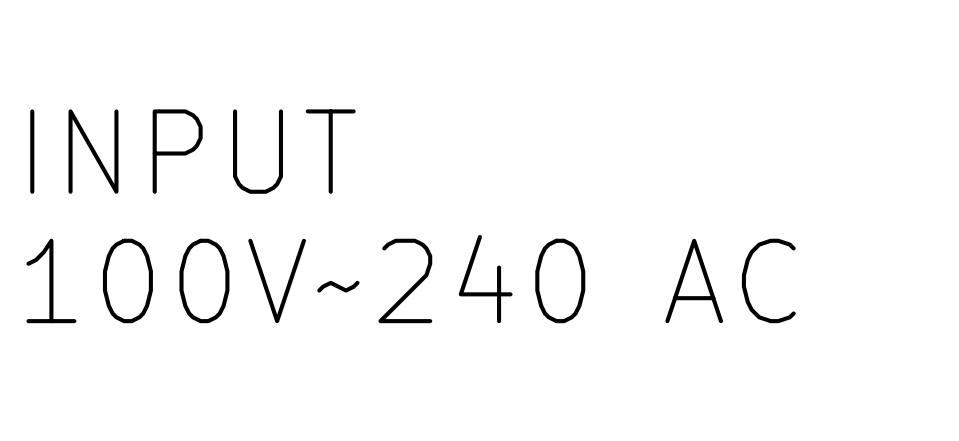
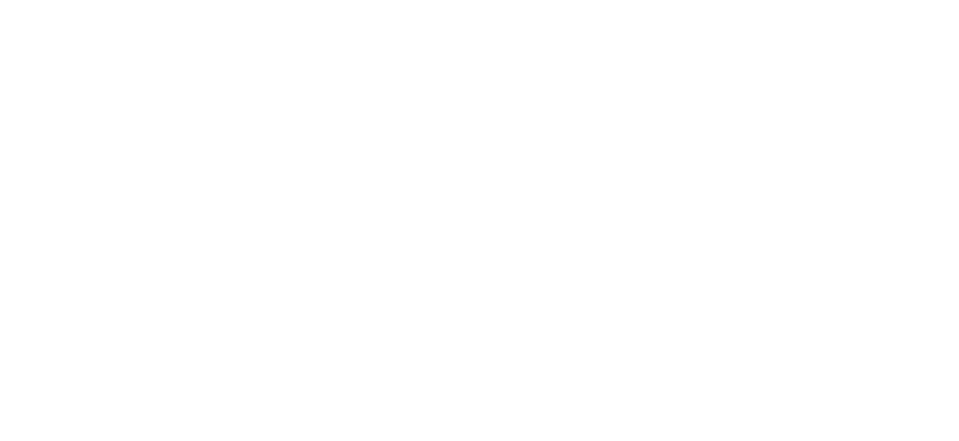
text: INPUT (192, 151) -> none
text: 100V~240 AC (411, 279) -> none

